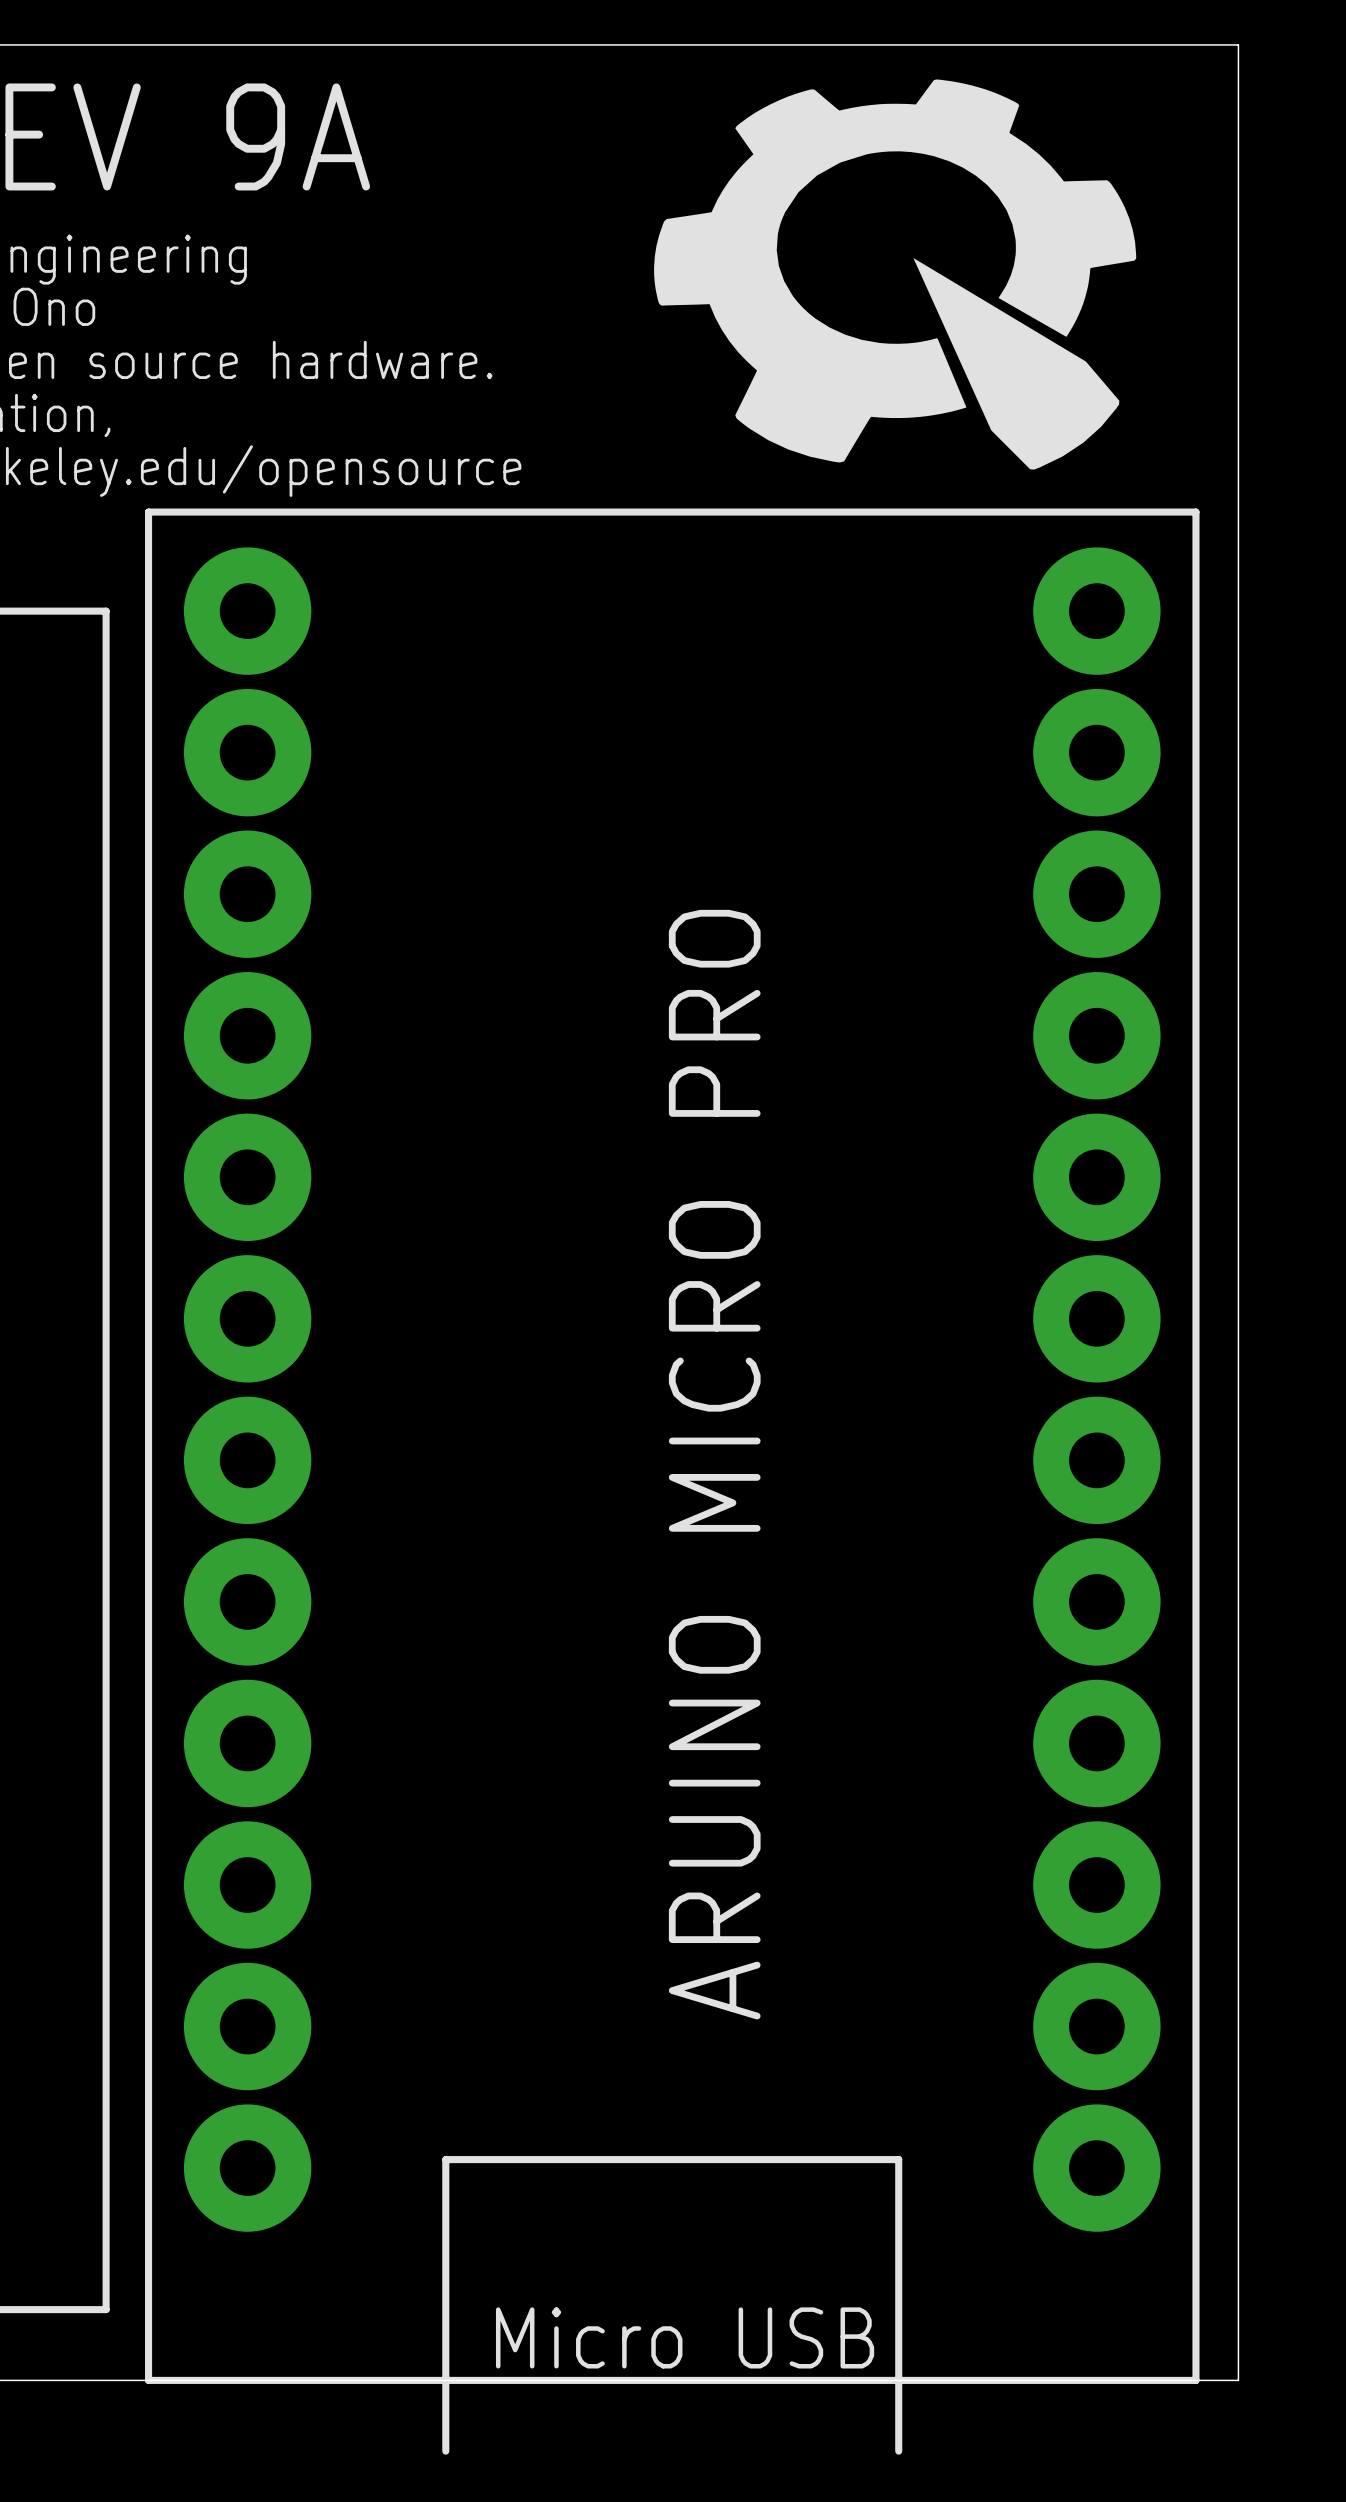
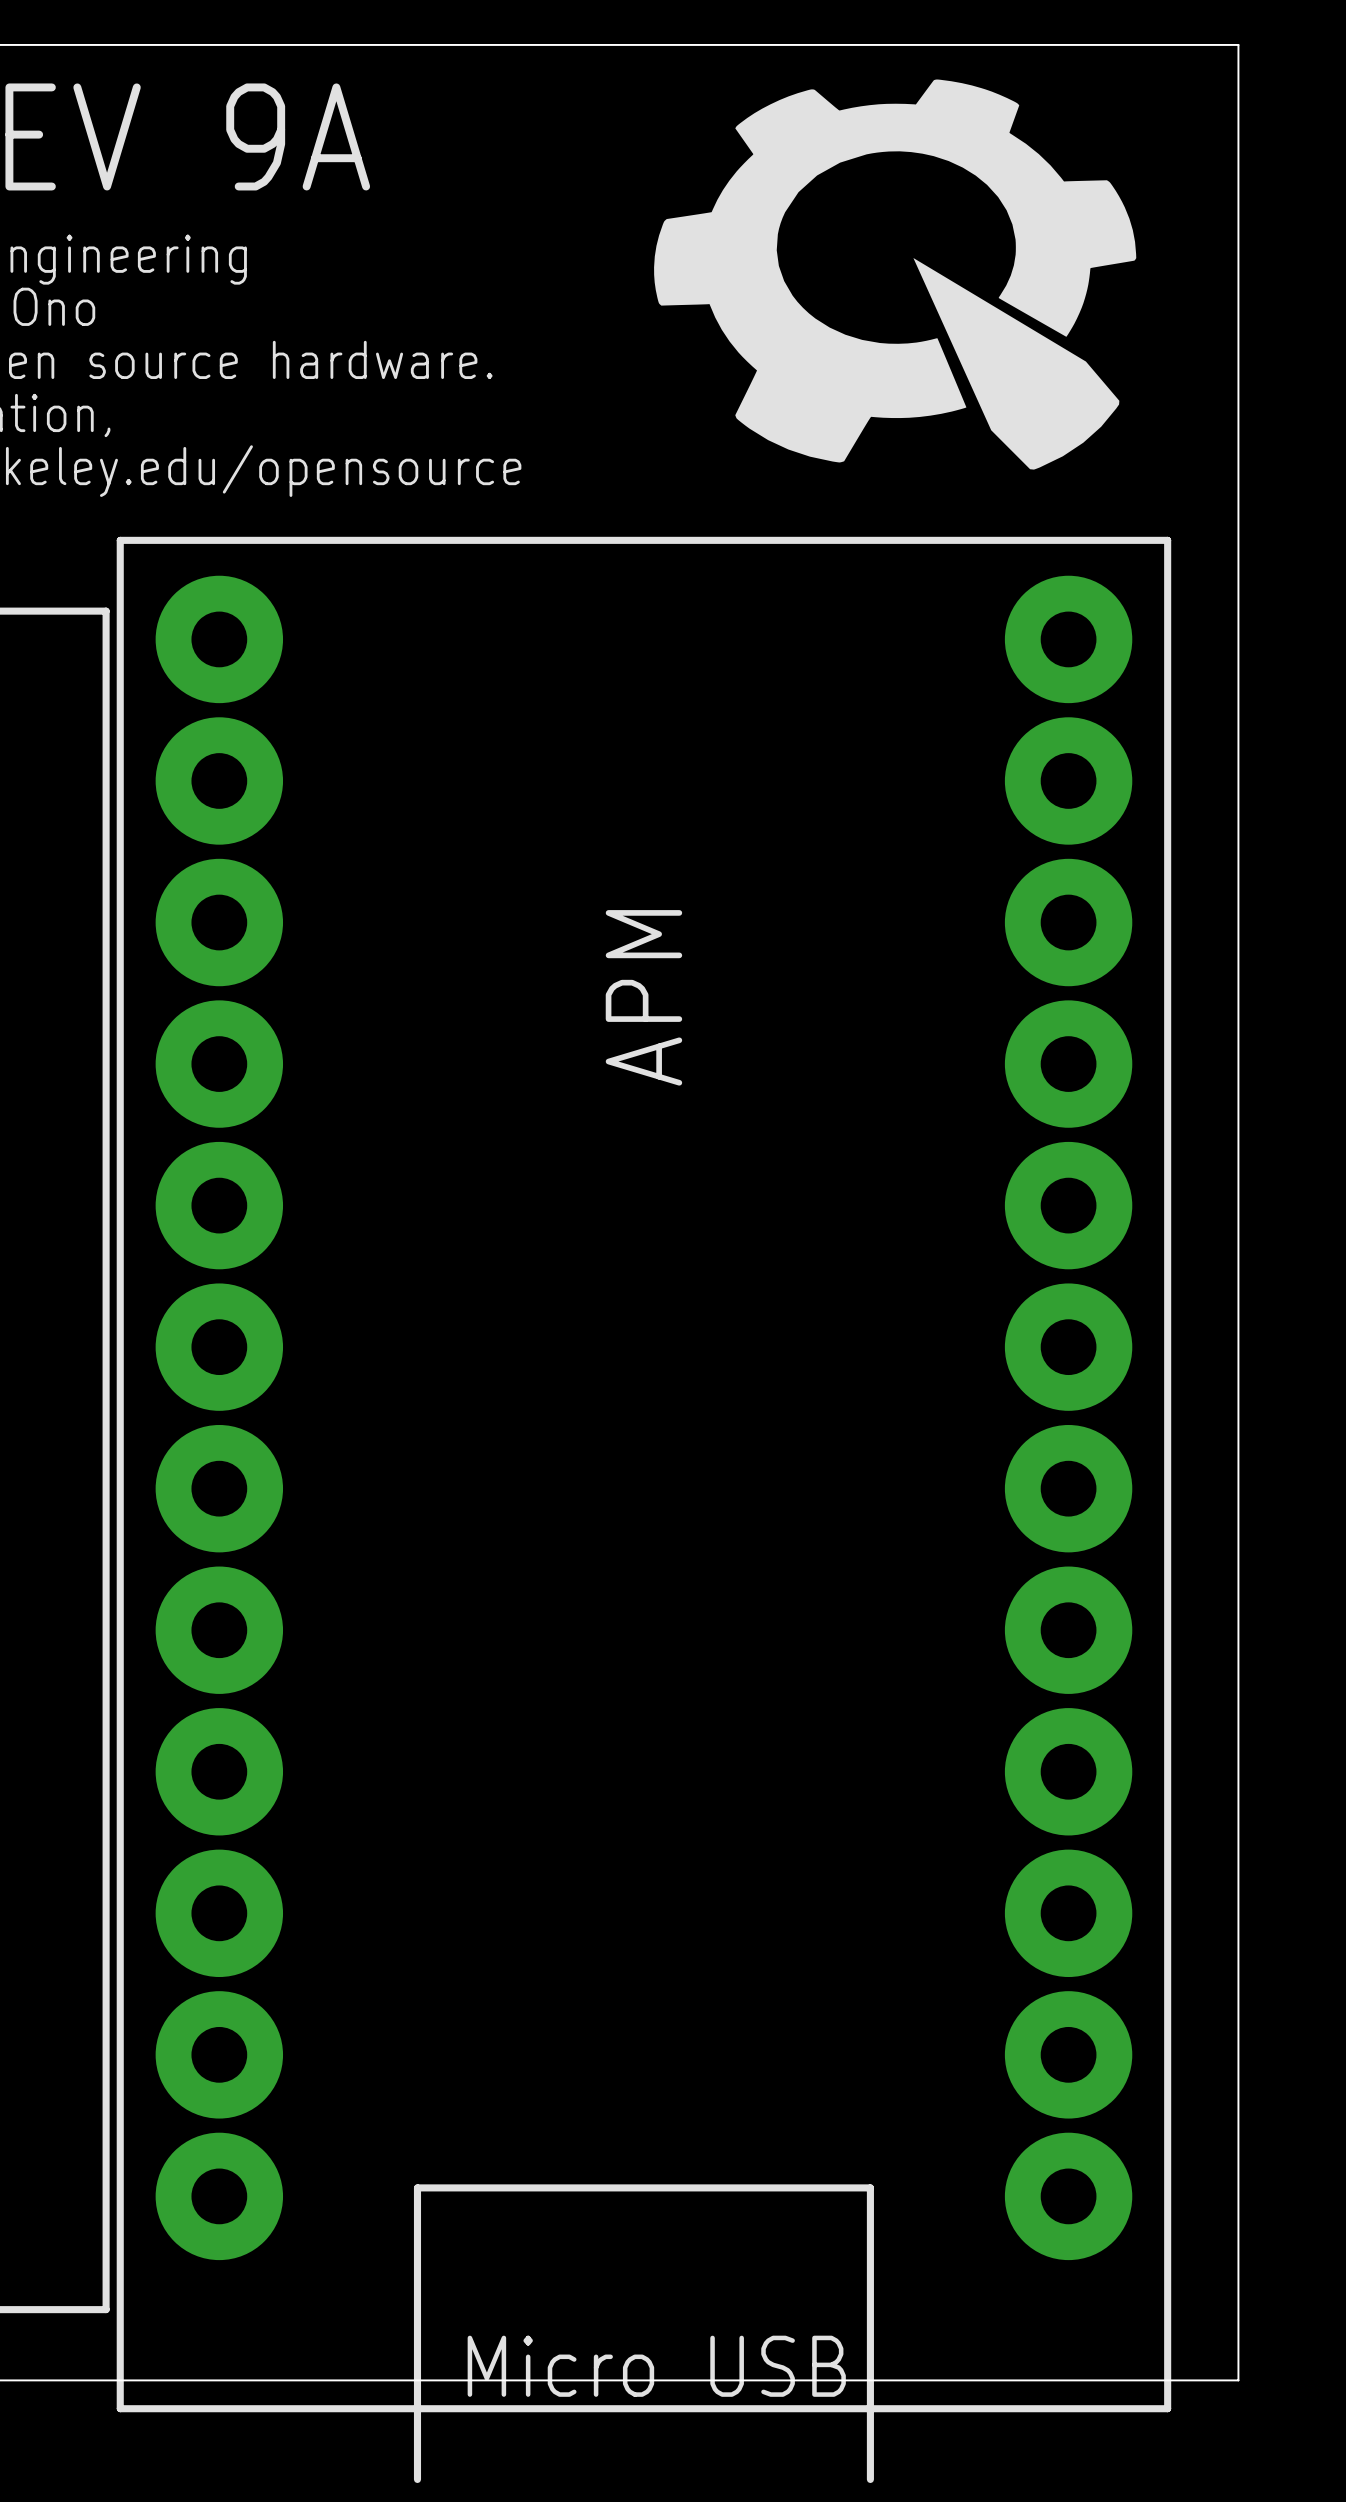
APM name: none -> APM (643, 997)
APM text: ARUINO MICRO PRO (714, 1464) -> none
APM position: (672, 1481) -> (643, 1509)

